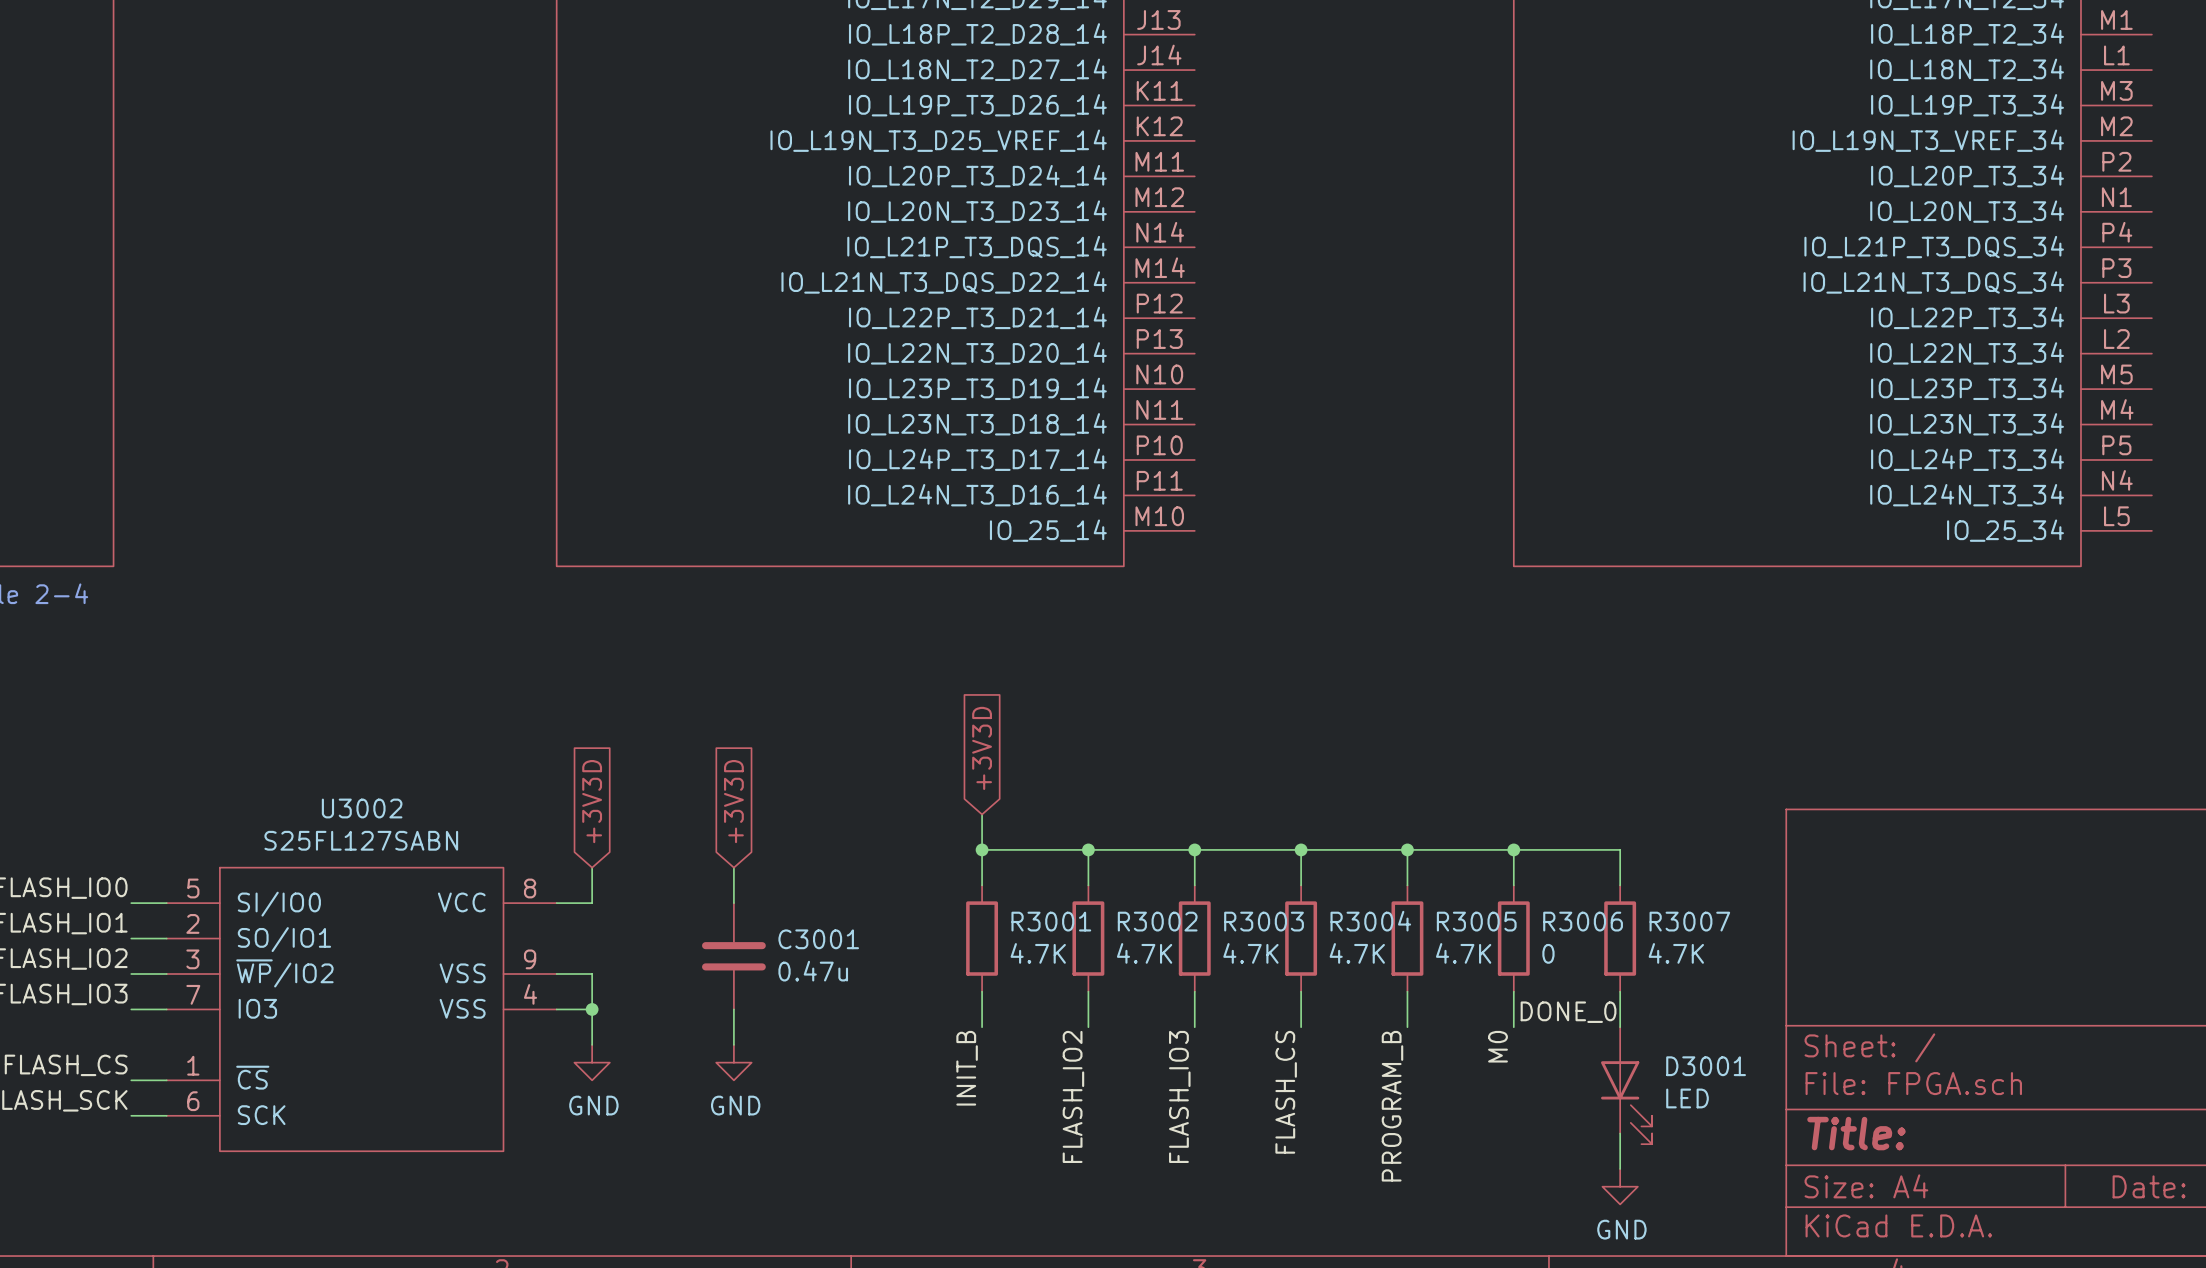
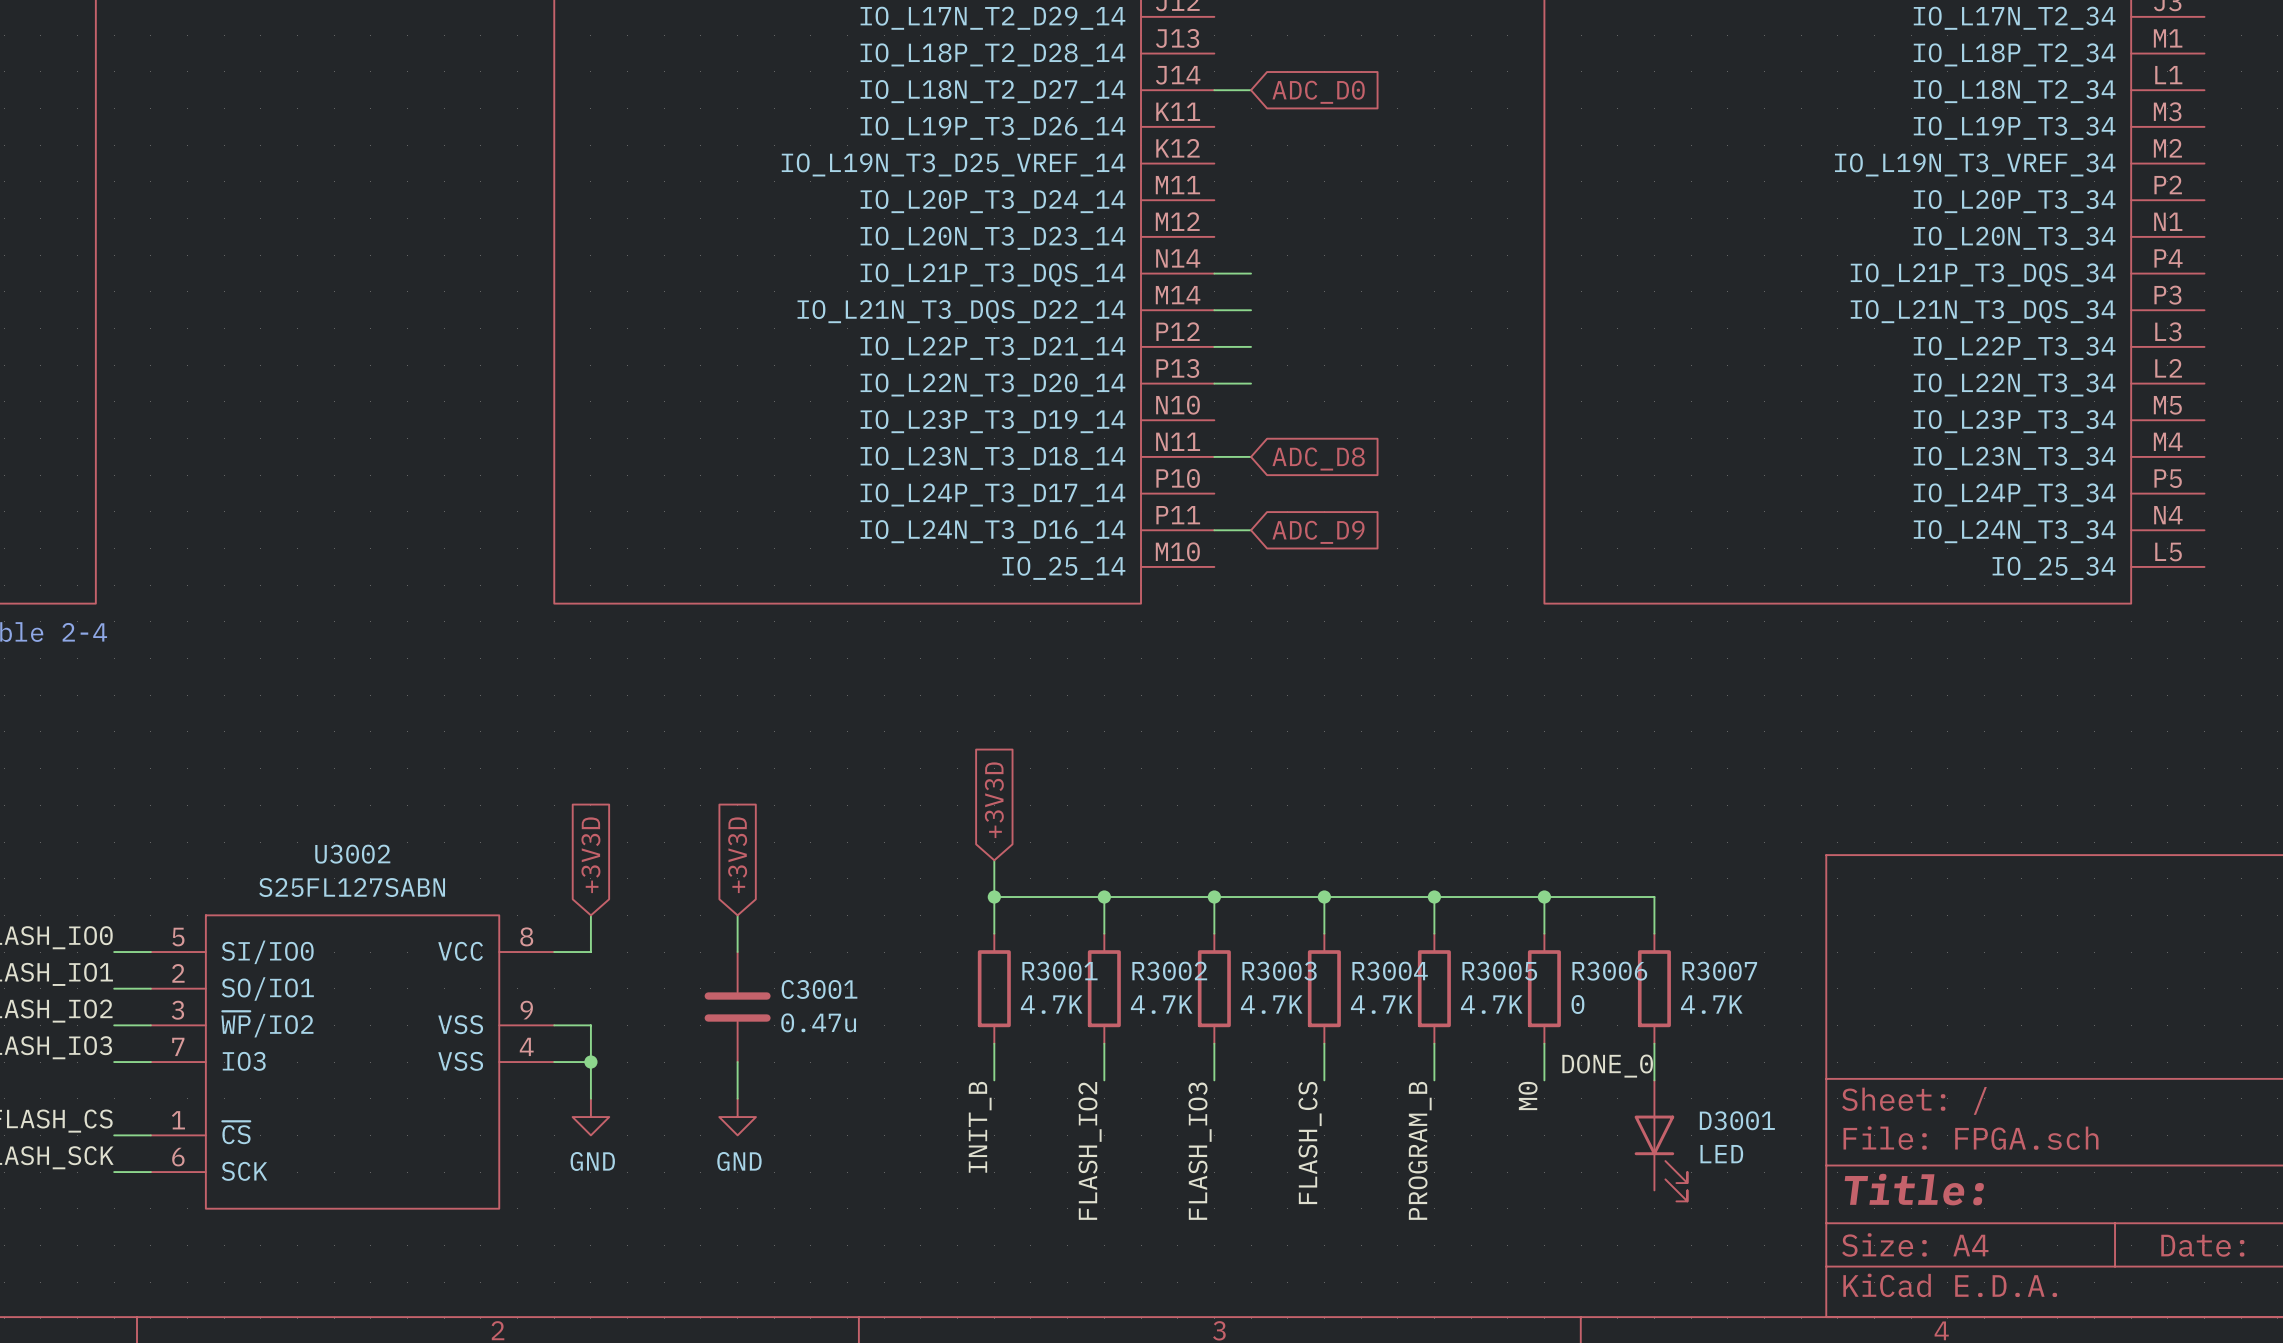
wire: none -> (1214, 90) (1251, 90)
global label: none -> ADC_D0 (1318, 92)
wire: none -> (1214, 273) (1251, 273)
wire: none -> (1214, 310) (1251, 310)
wire: none -> (1214, 346) (1251, 346)
wire: none -> (1214, 383) (1251, 383)
wire: none -> (1214, 456) (1251, 456)
global label: none -> ADC_D8 (1318, 459)
wire: none -> (1214, 530) (1251, 530)
global label: none -> ADC_D9 (1318, 532)
wire: (1620, 1133) (1620, 1168) -> none
power symbol: GND (1620, 1186) -> none

